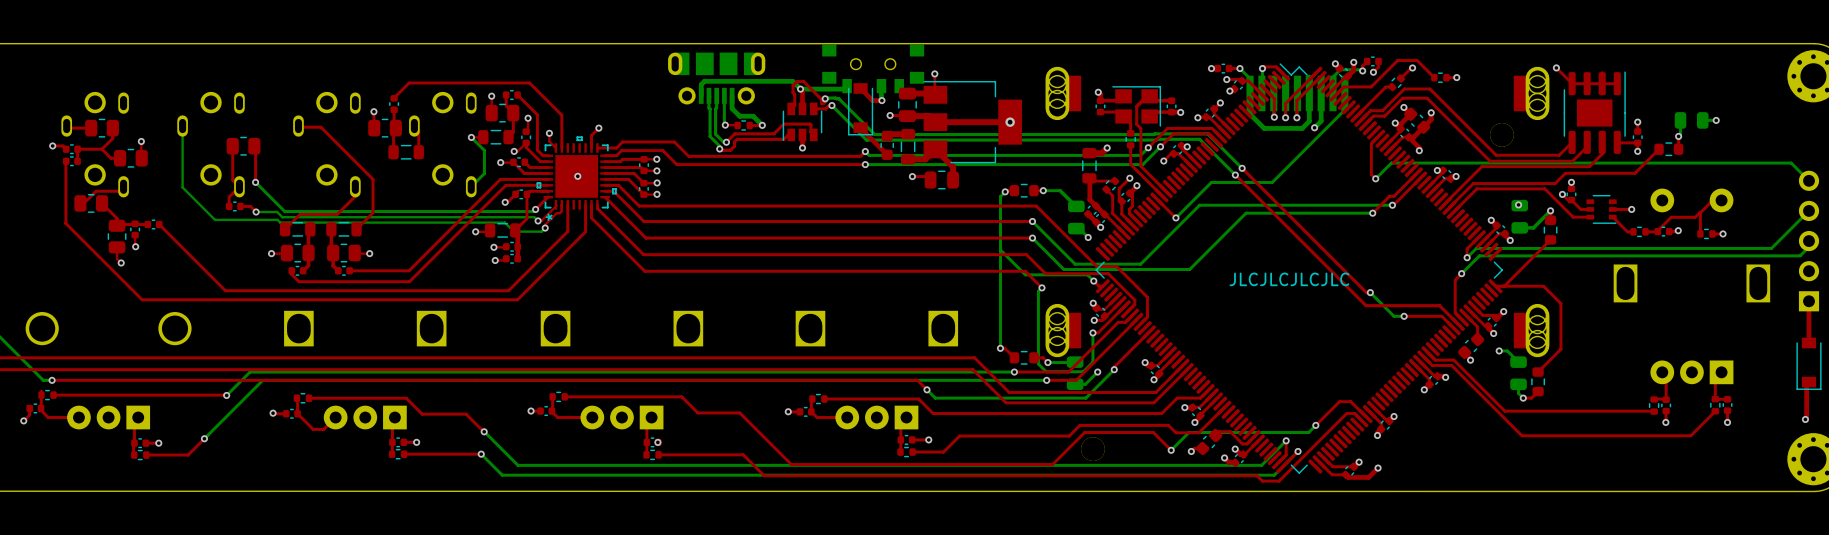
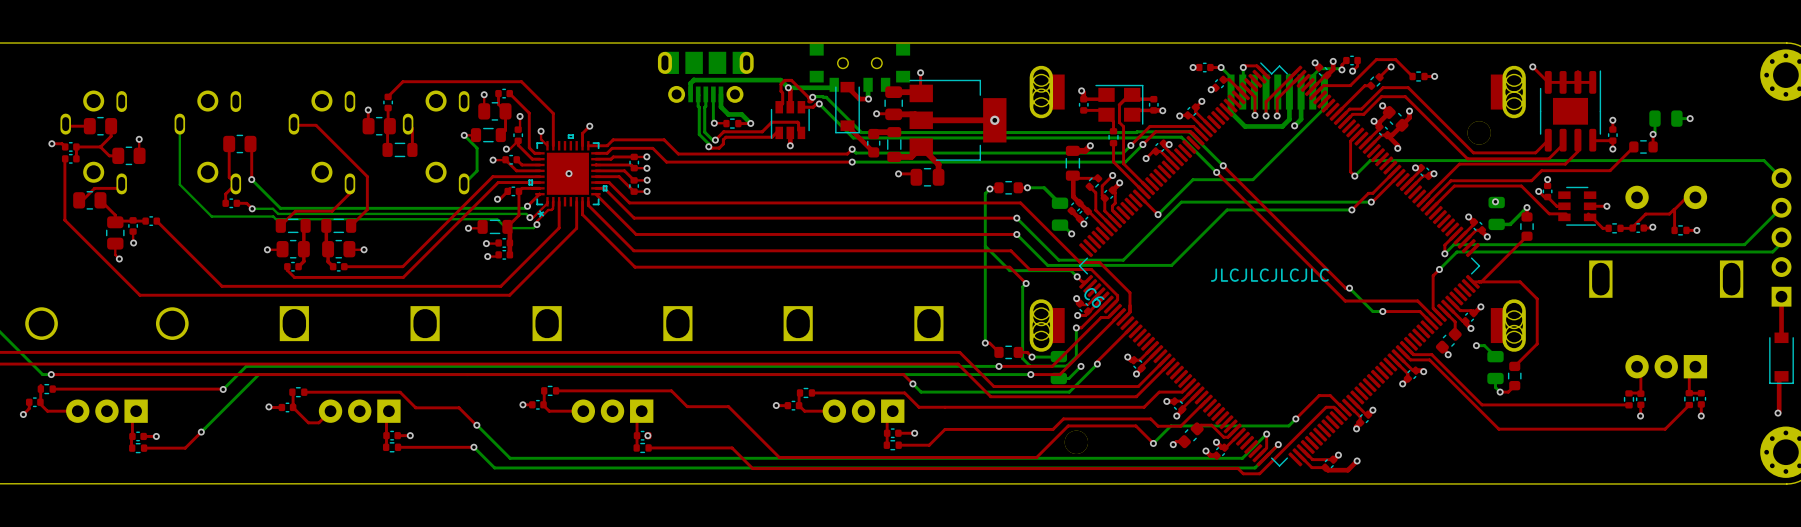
top track: (1226, 79) (1242, 81) -> none
via: (1226, 79) -> none
part footprint: [1586, 194, 1617, 224] -> [1558, 186, 1597, 226]
C6 name: none -> C6 (1094, 297)

